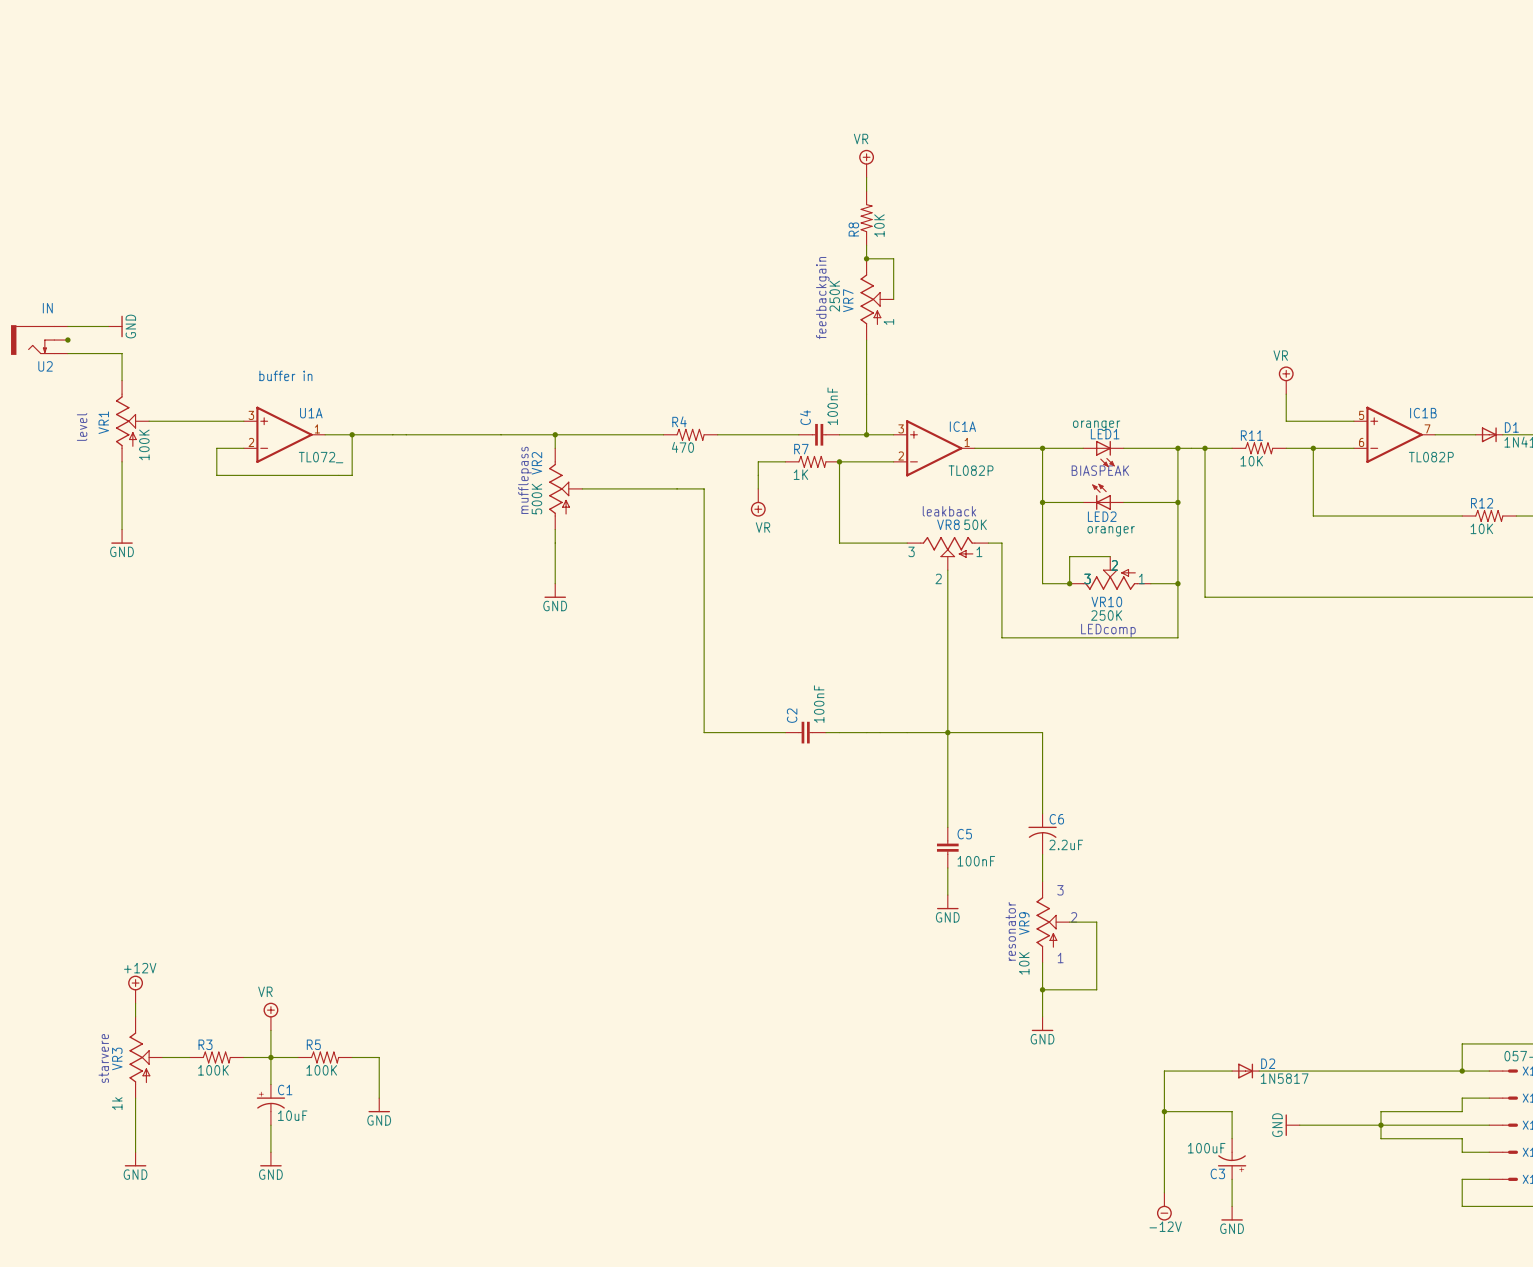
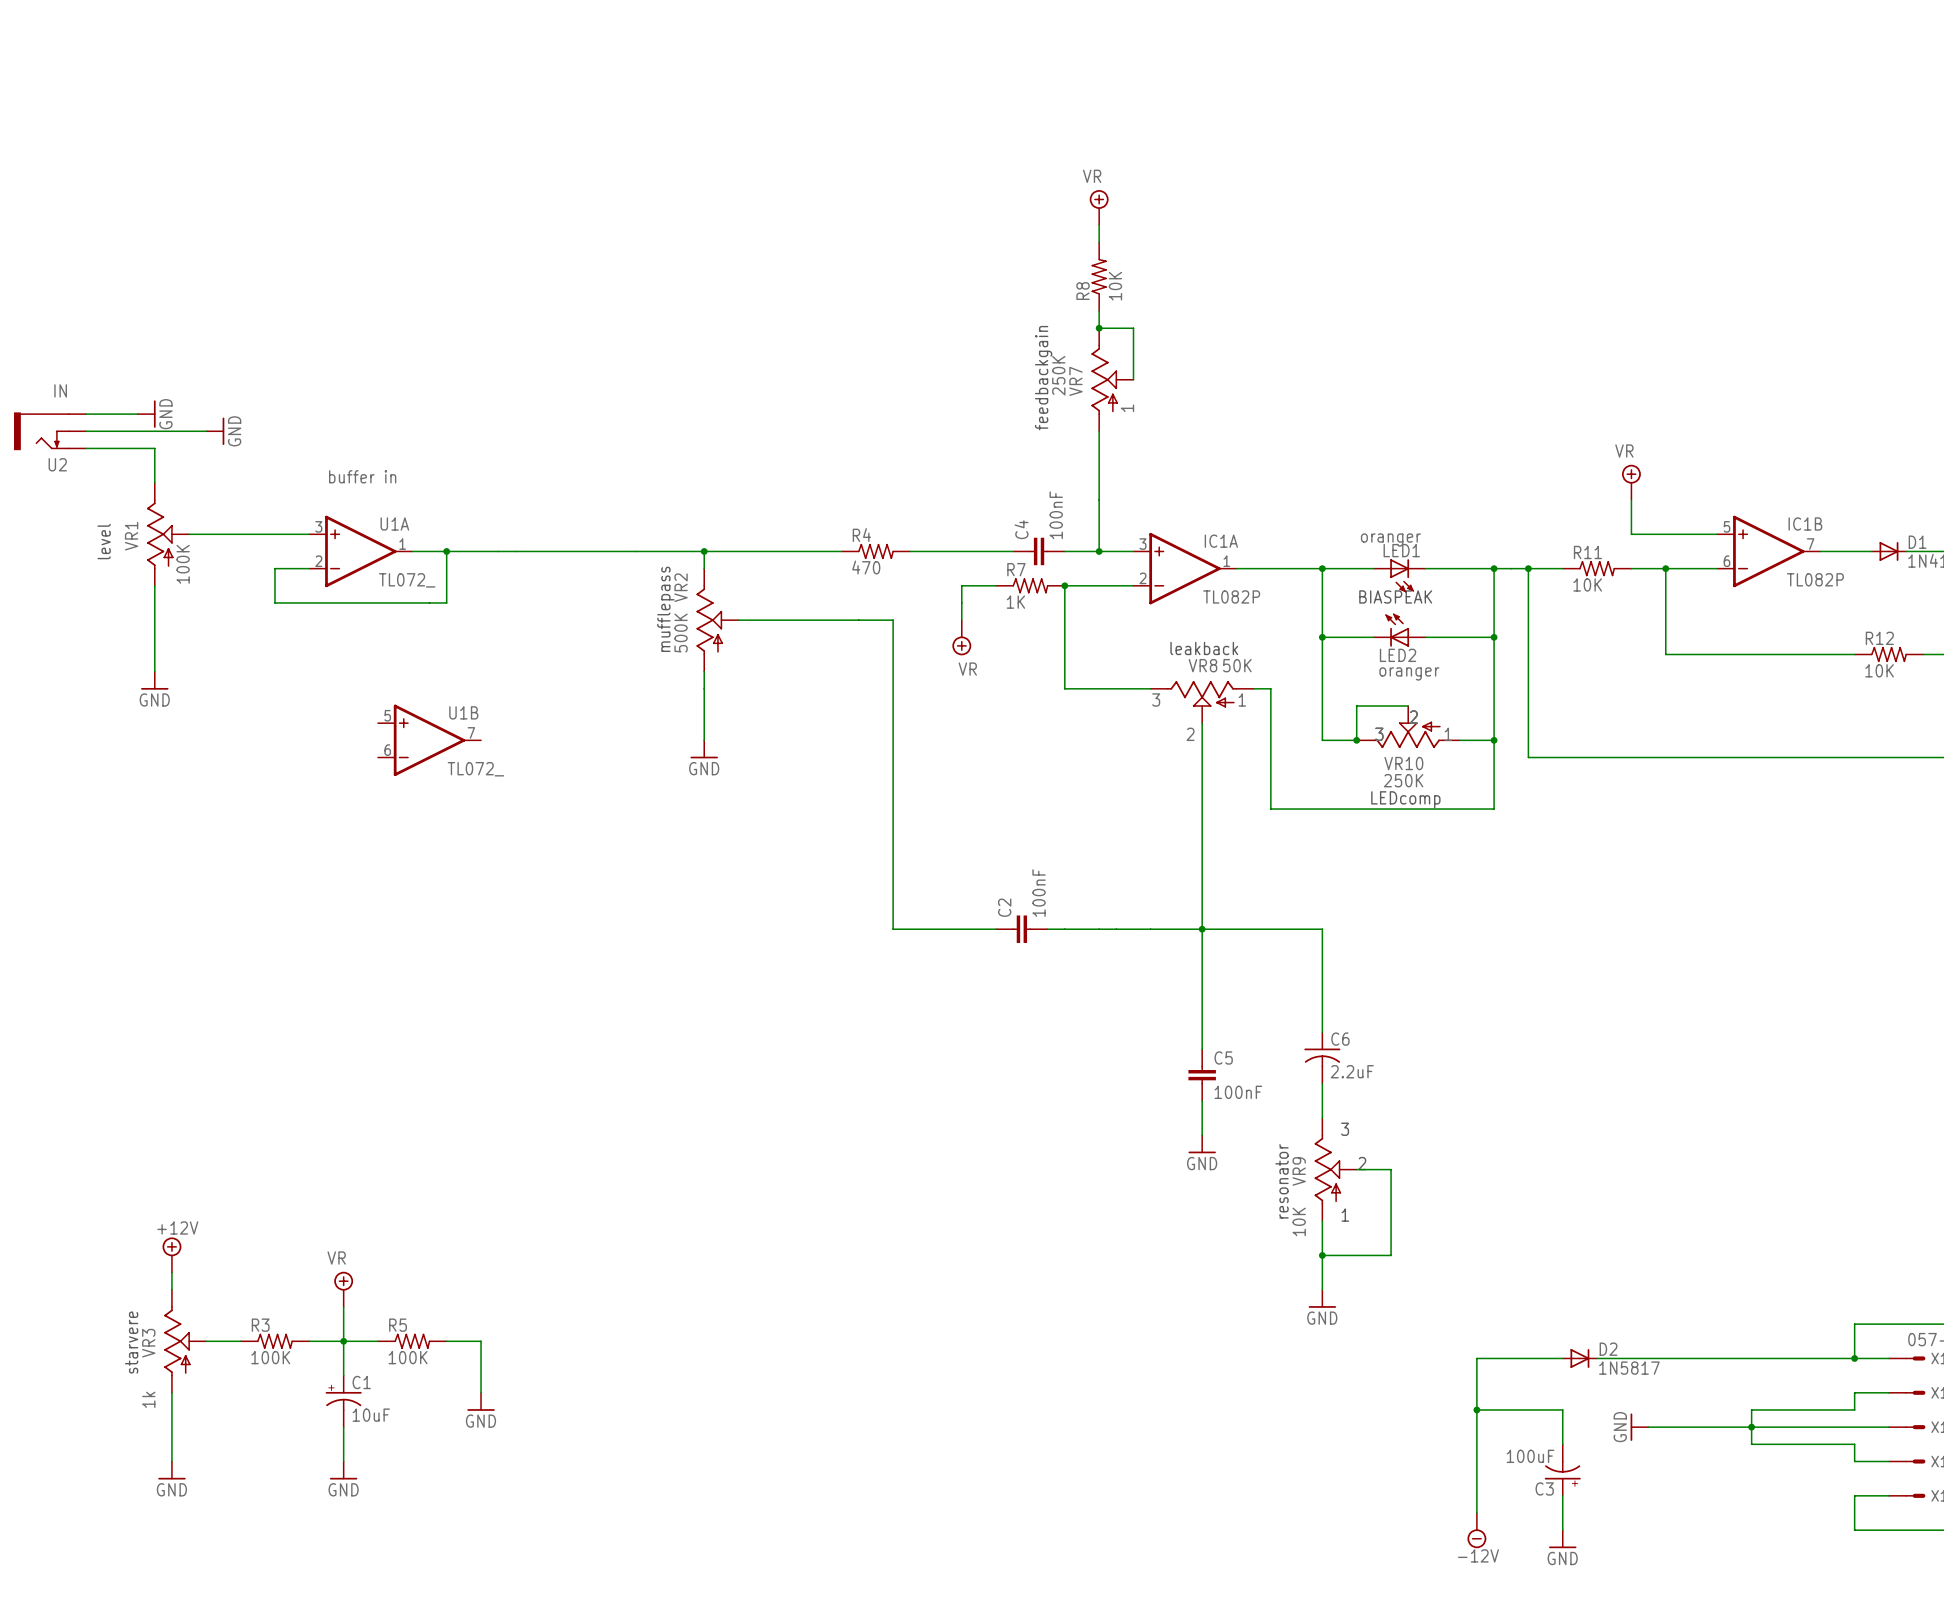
wire: none -> (86, 431) (206, 431)
junction: (67, 340) -> none
power symbol: none -> GND (215, 431)
U1B: none -> TL072_ (429, 740)

